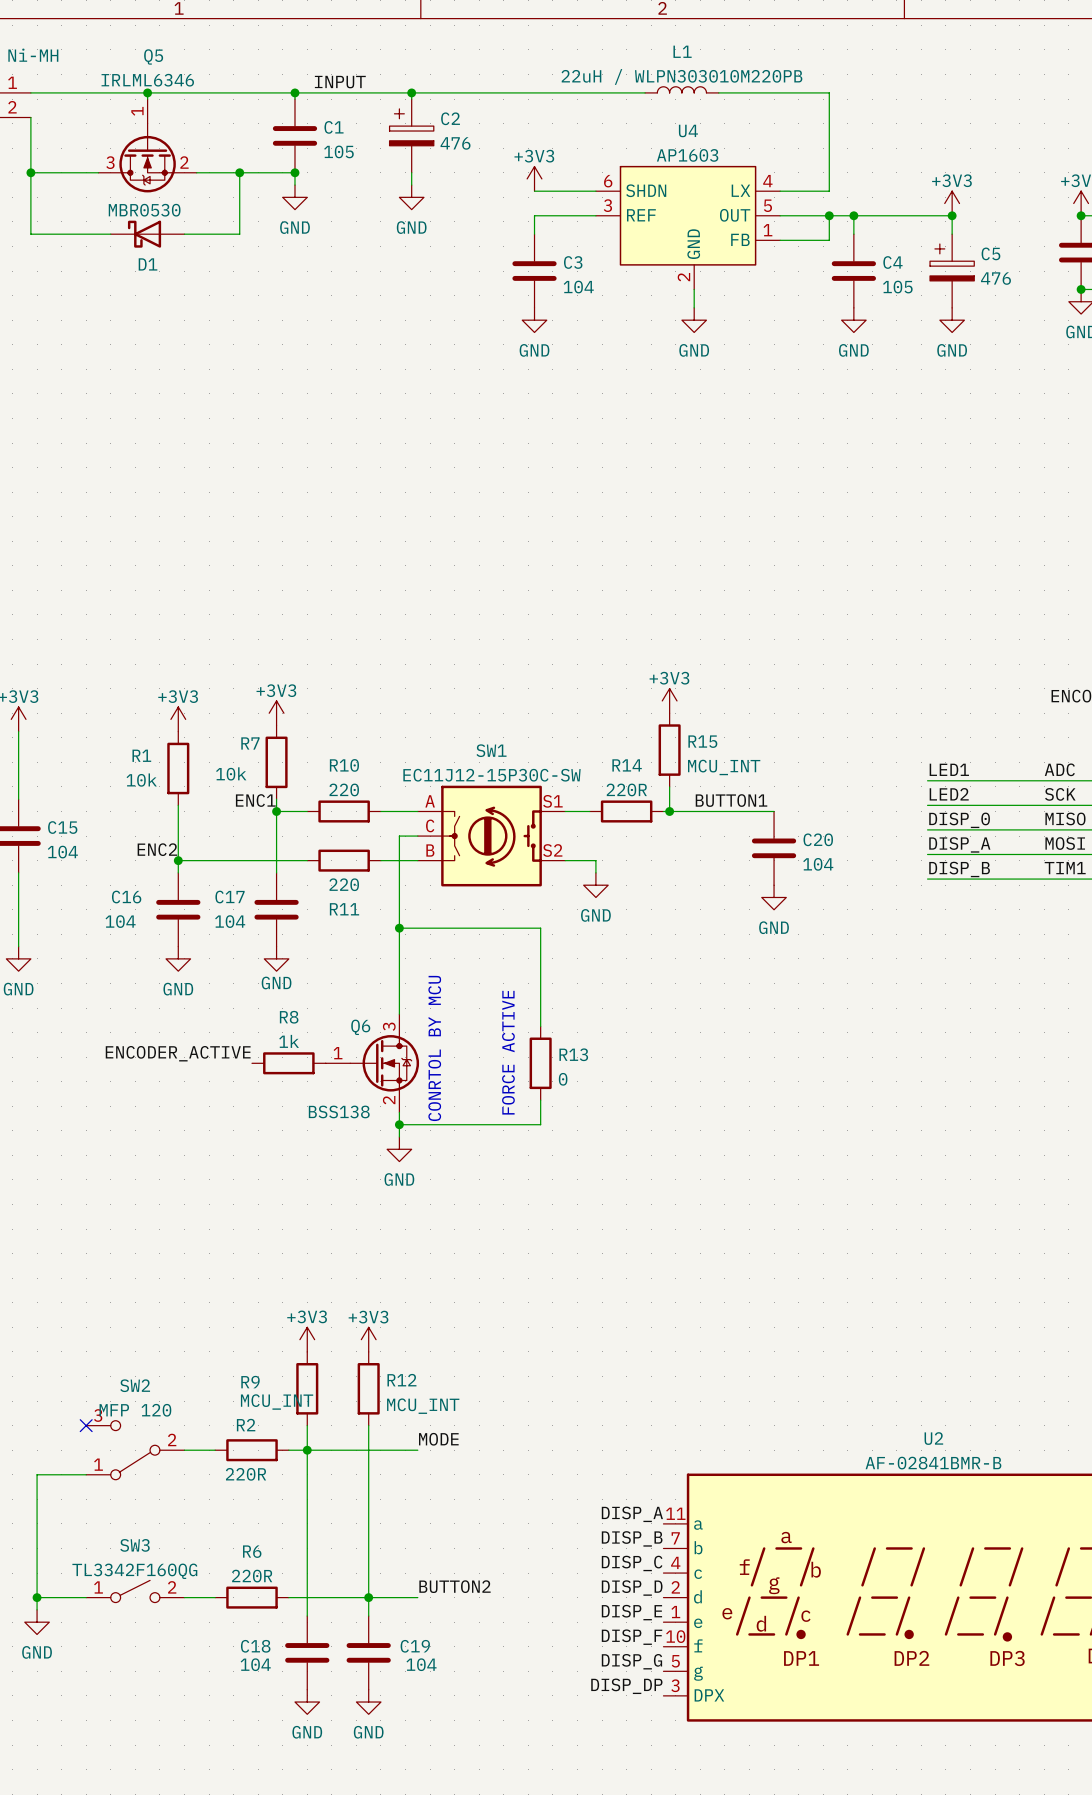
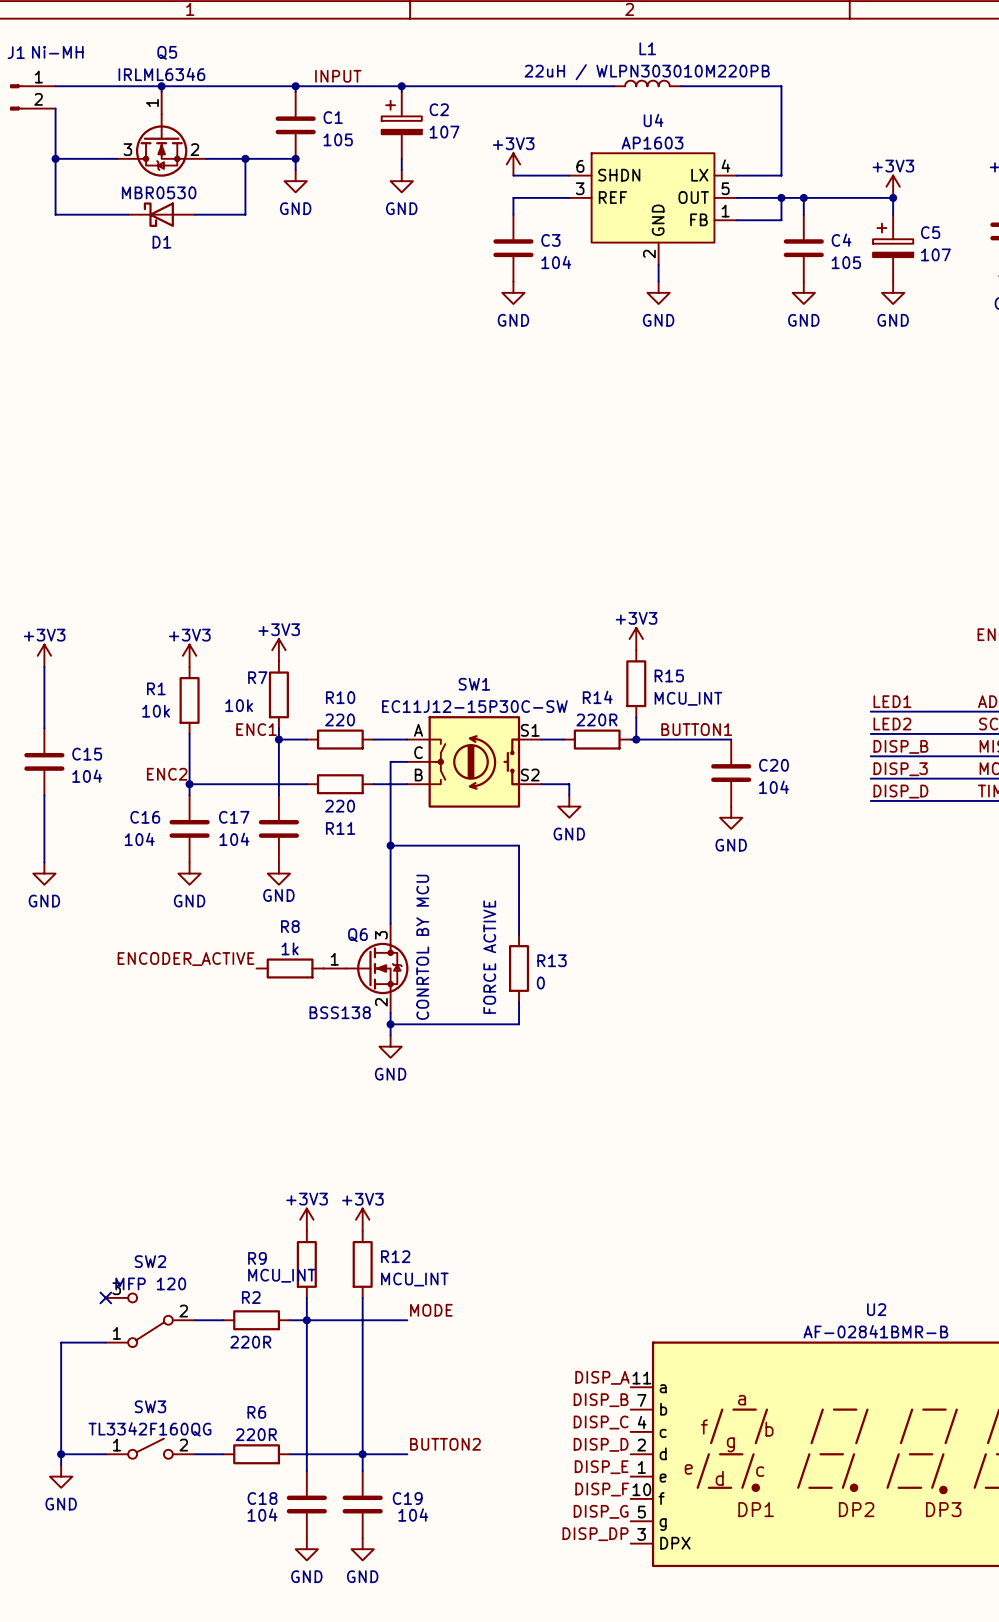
C2 value: 476 (455, 143) -> 107 (444, 132)
C5 value: 476 (995, 278) -> 107 (935, 254)
label: DISP_0 (959, 820) -> DISP_B (900, 746)
label: DISP_A (959, 844) -> DISP_3 (900, 769)
label: DISP_B (959, 869) -> DISP_D (900, 791)

